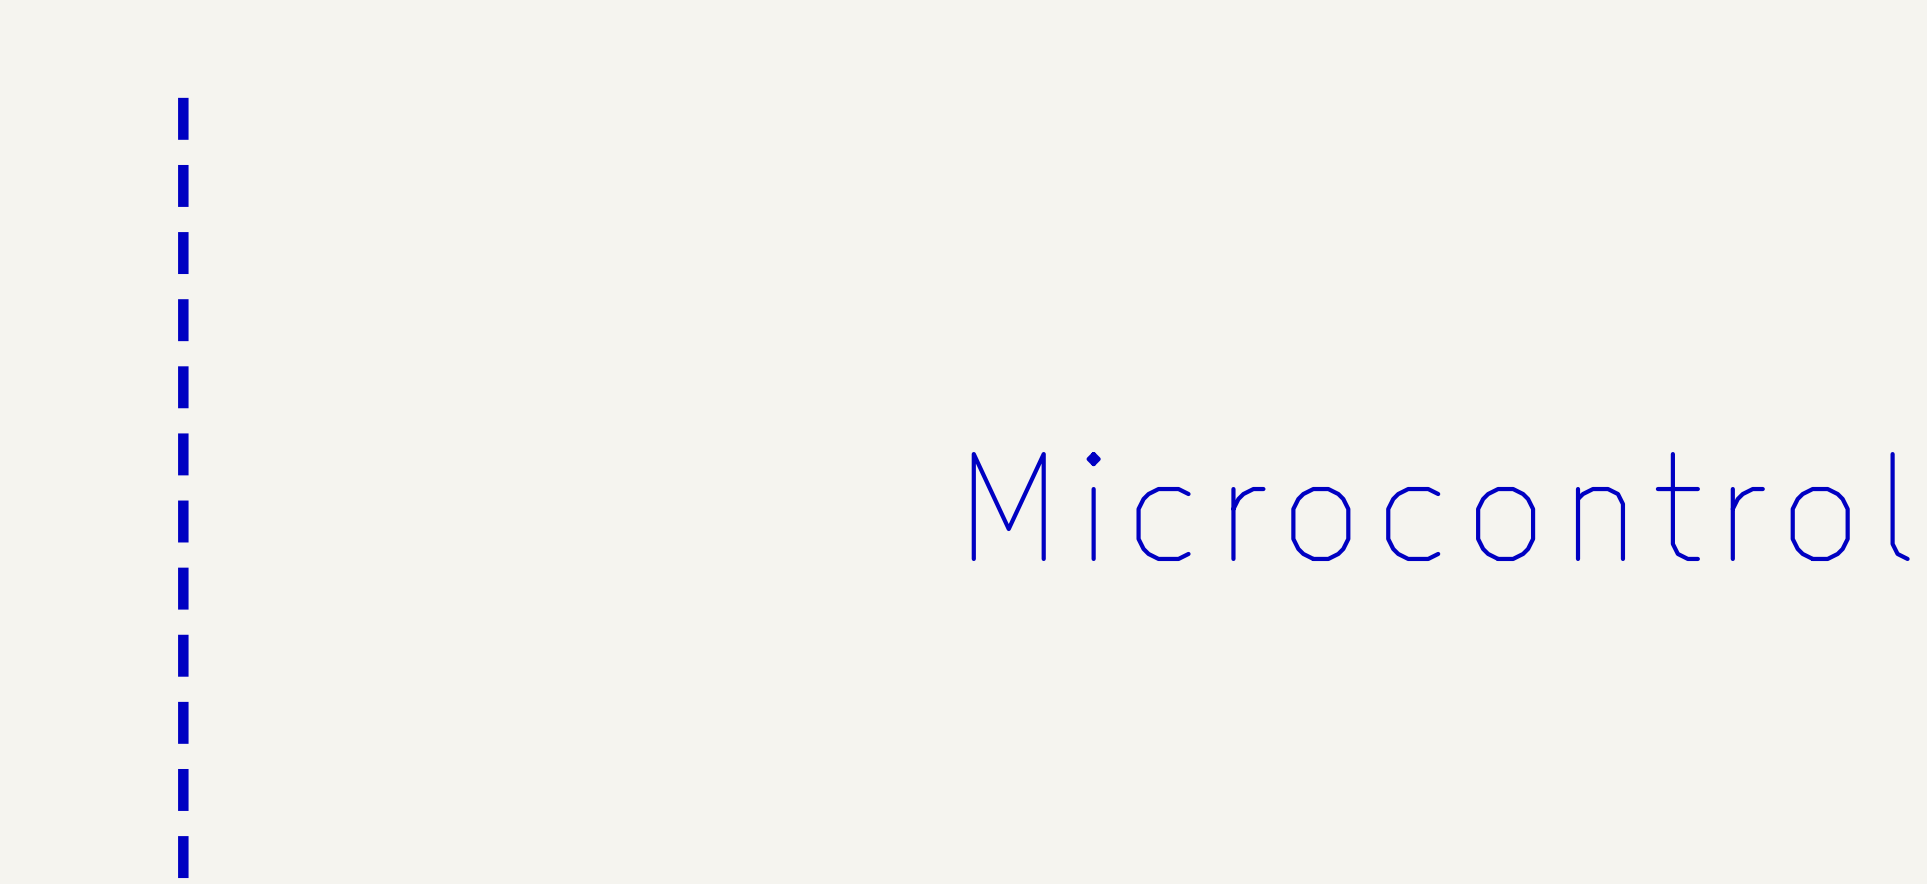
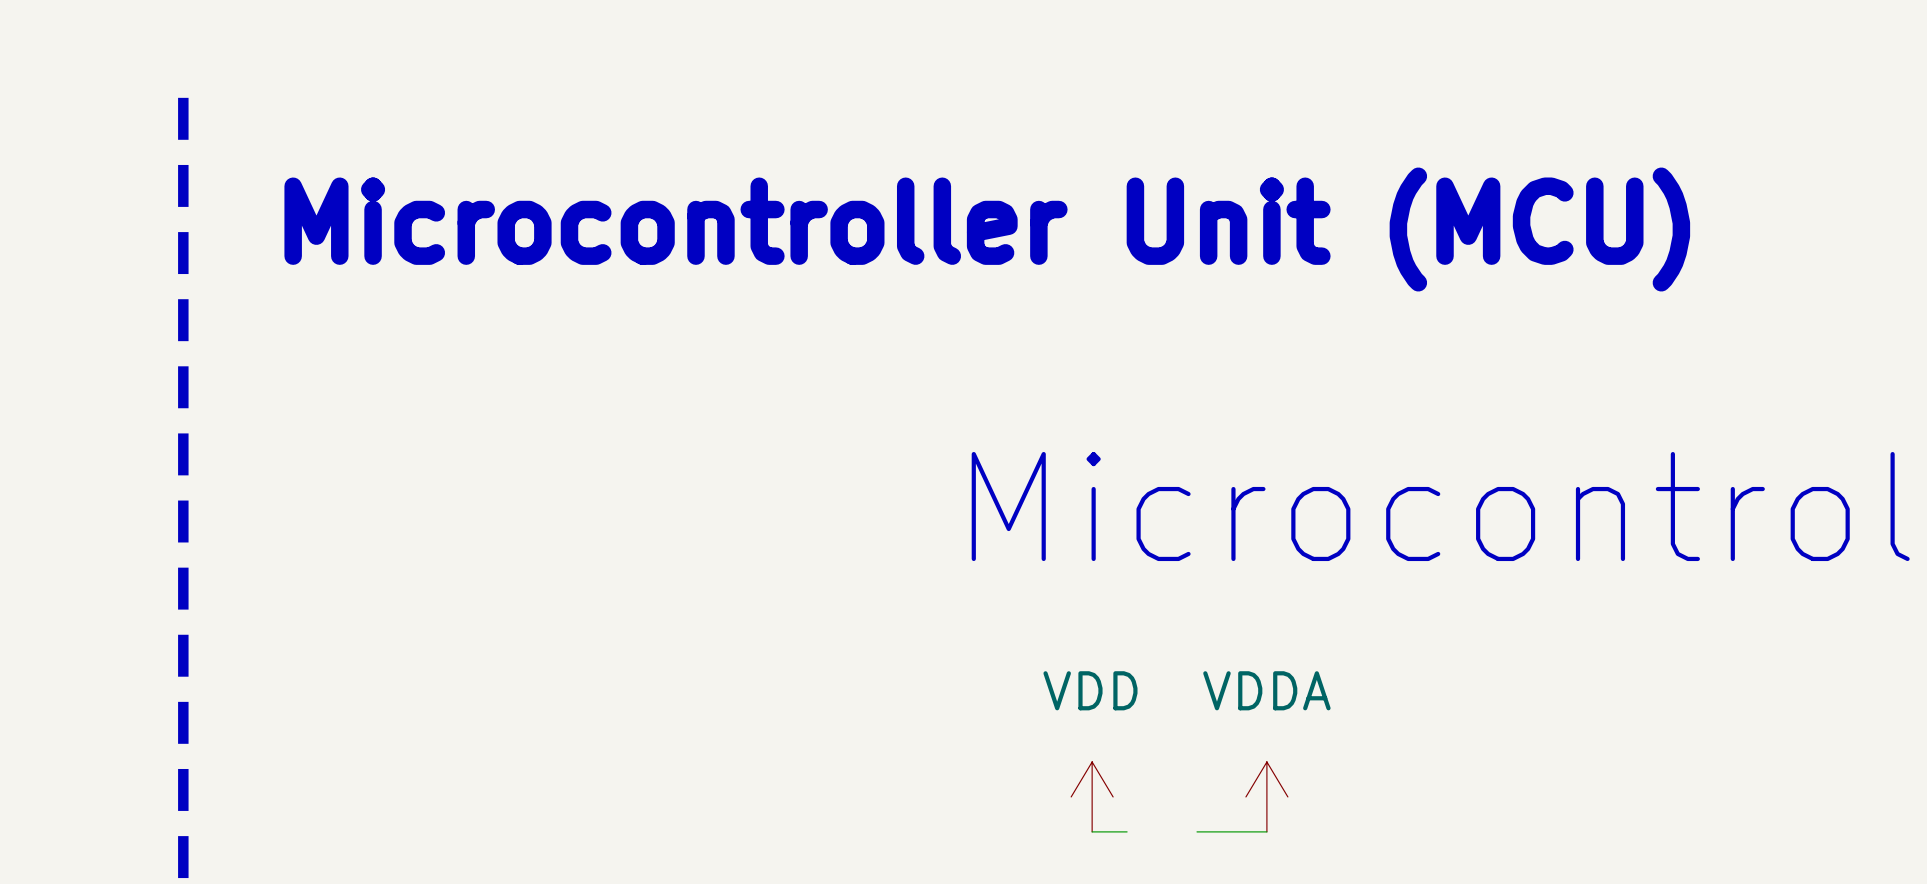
text: none -> Microcontroller Unit (MCU) (987, 229)
power symbol: none -> VDD (1092, 796)
power symbol: none -> VDDA (1266, 796)
wire: none -> (1092, 831) (1127, 831)
wire: none -> (1197, 831) (1266, 831)

